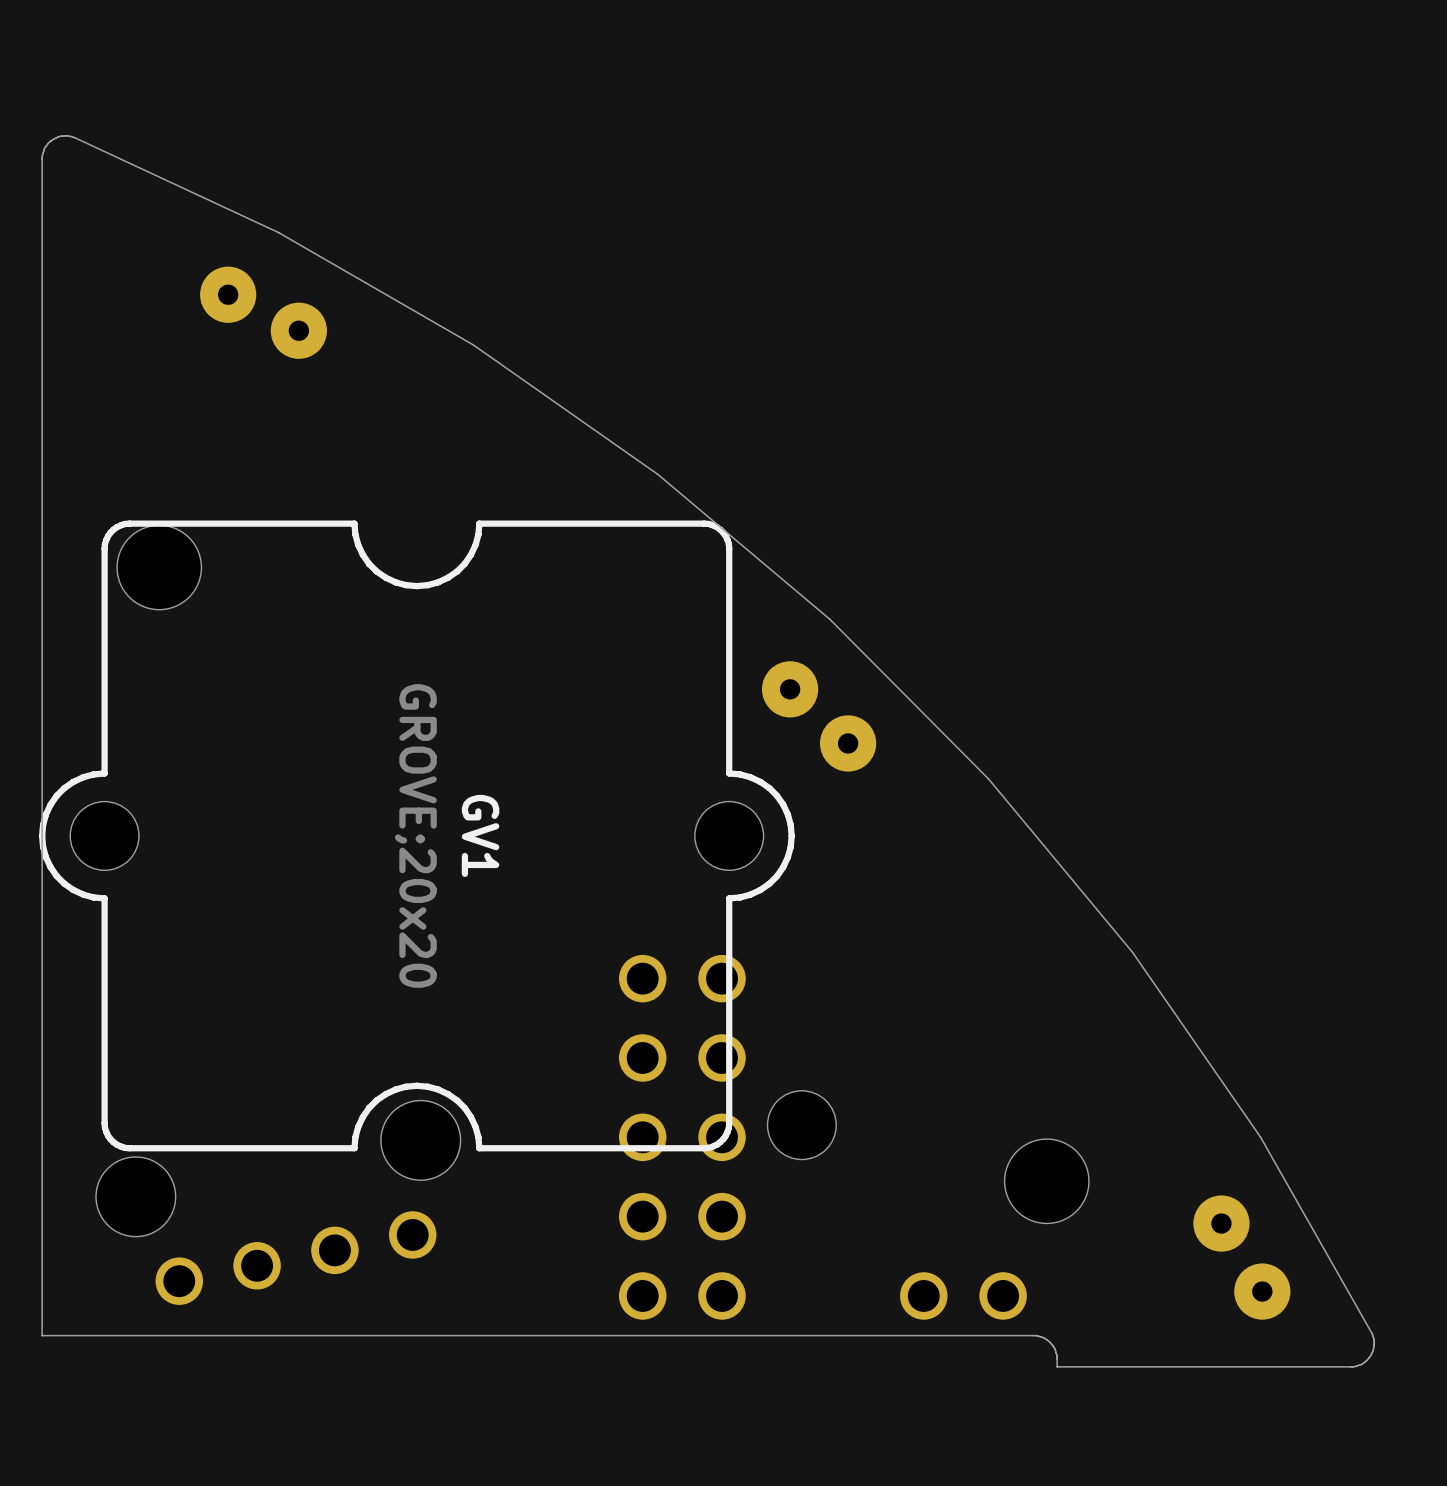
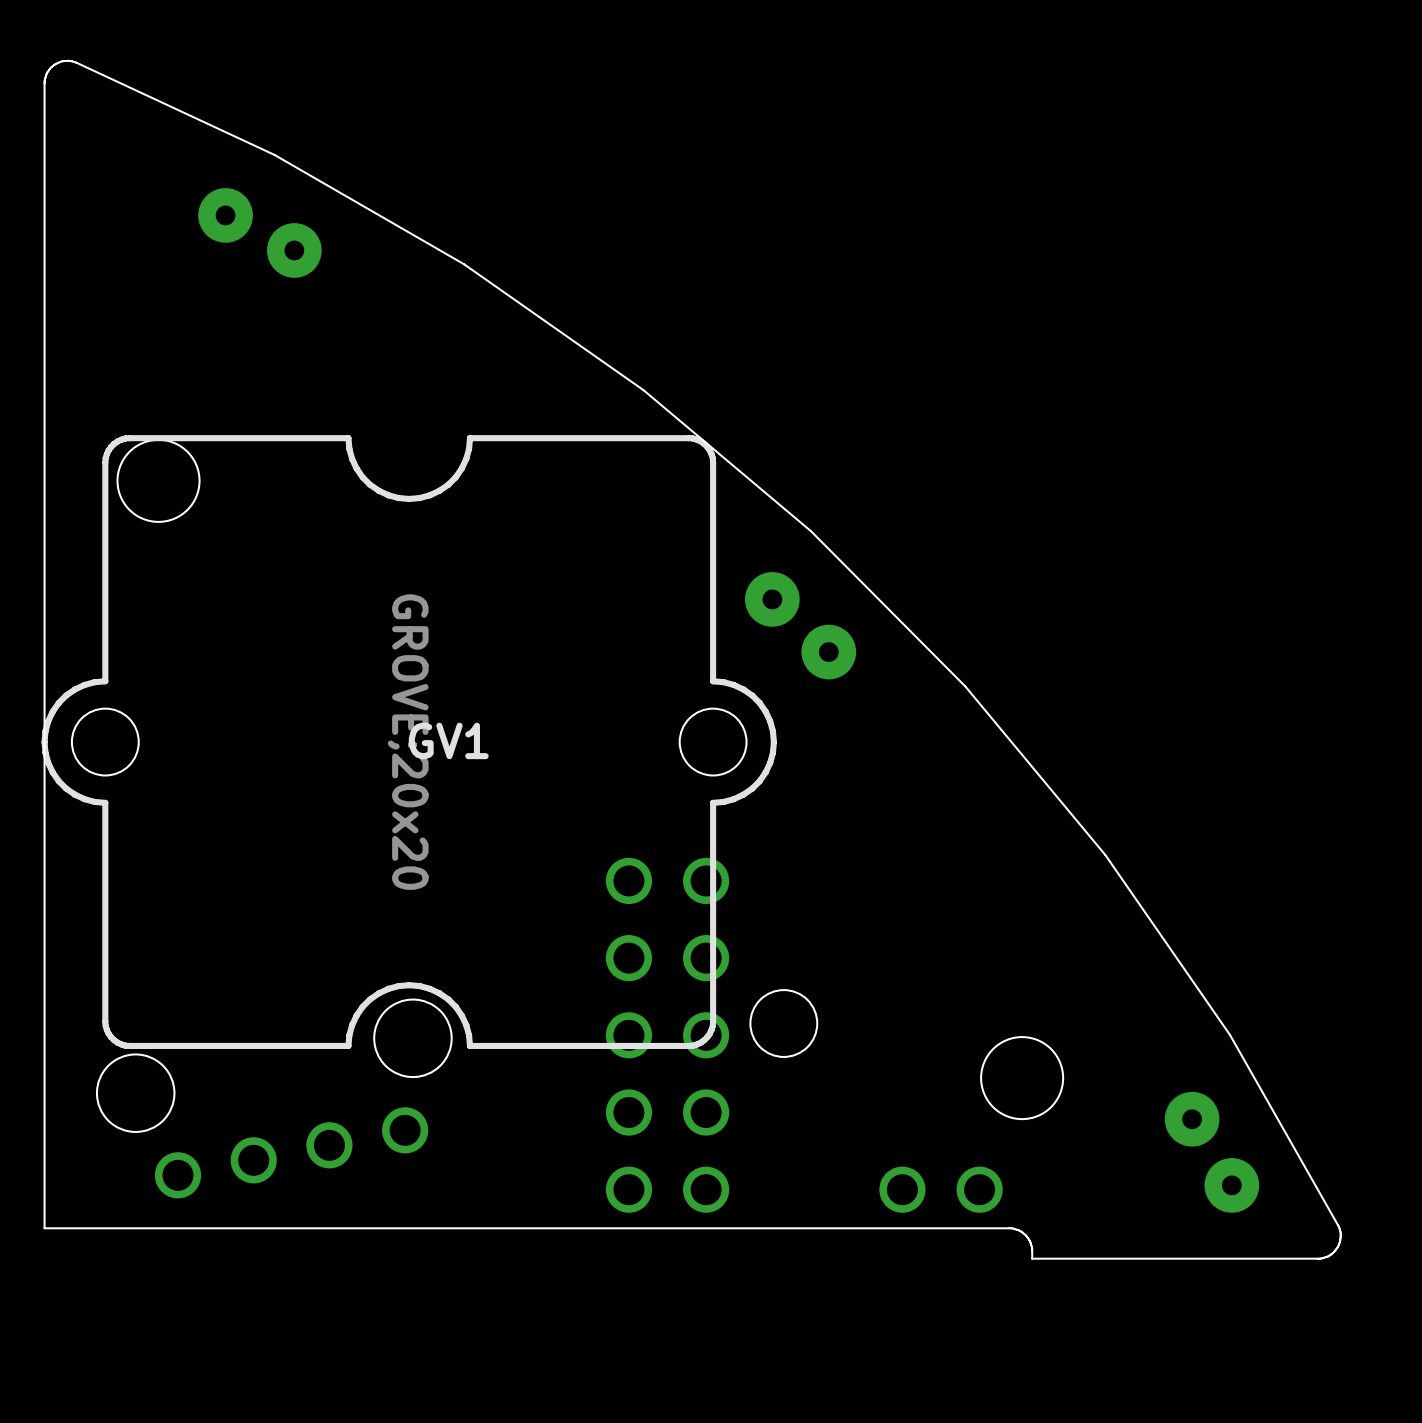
GV1 name rotation: 0° (480, 835) -> 90° counterclockwise (448, 740)

